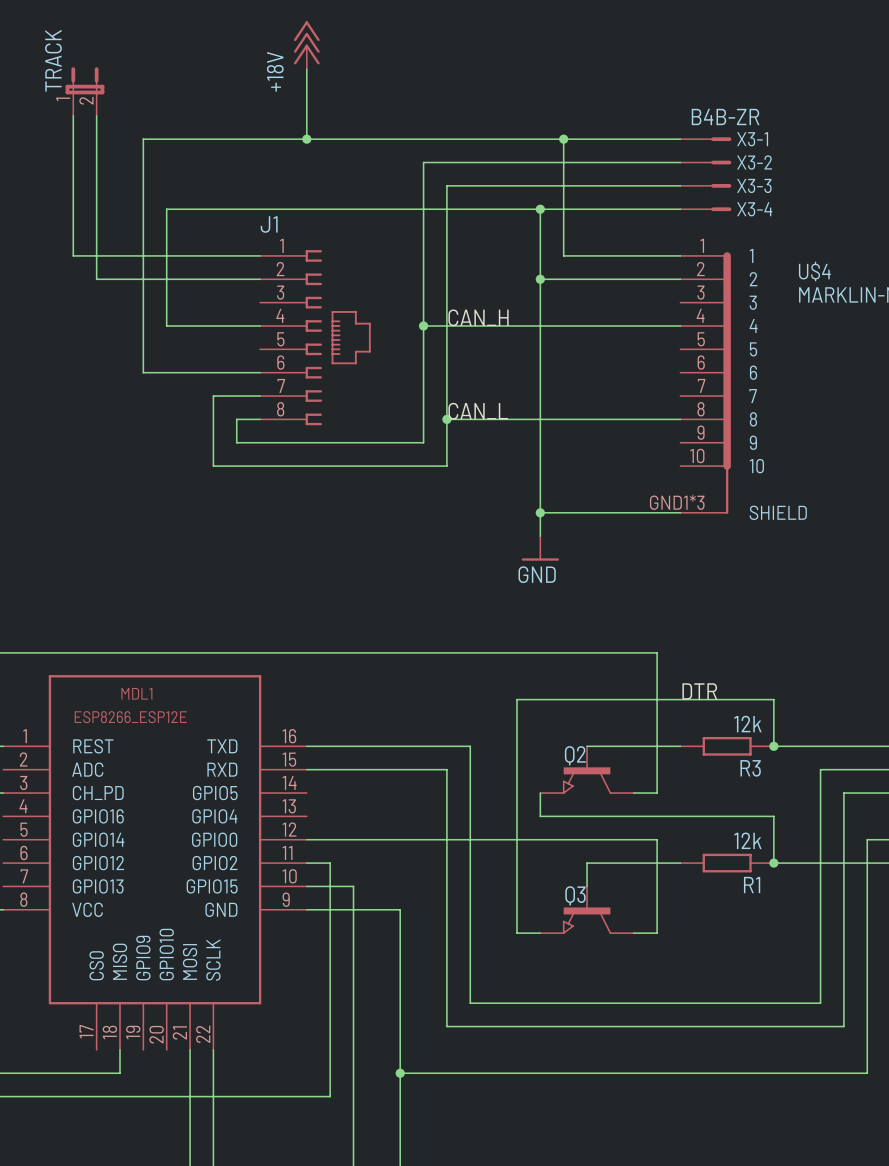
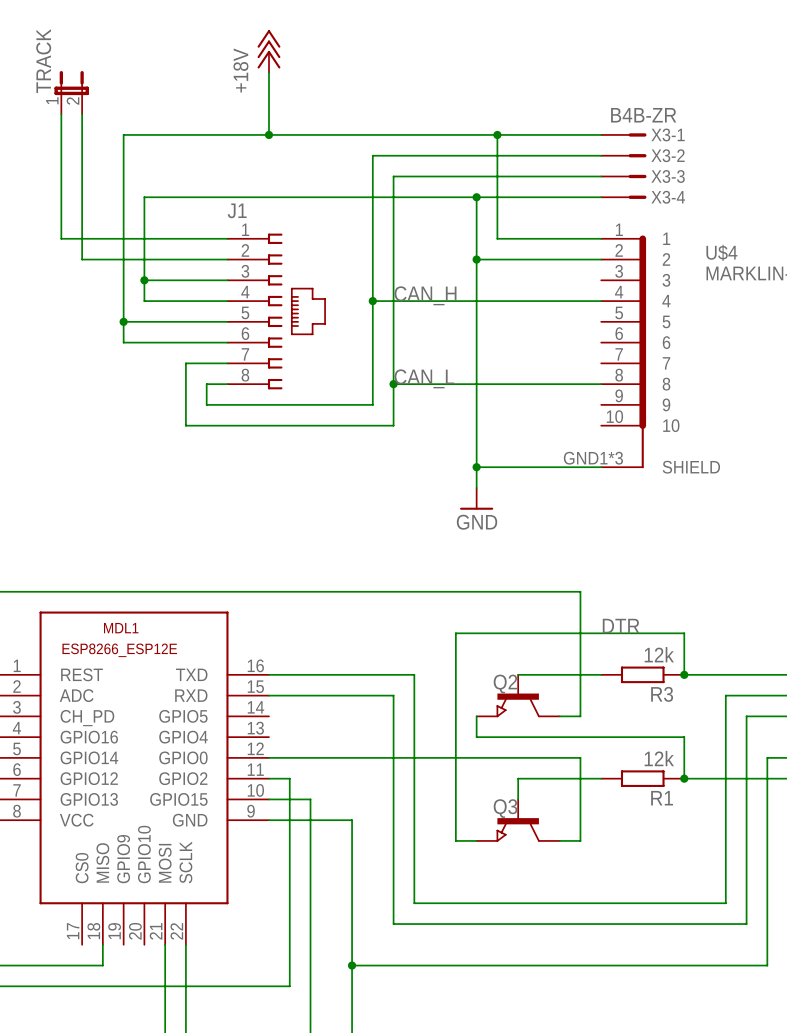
wire: none -> (144, 280) (227, 280)
junction: none -> (144, 280)
wire: none -> (123, 321) (227, 321)
junction: none -> (123, 321)

